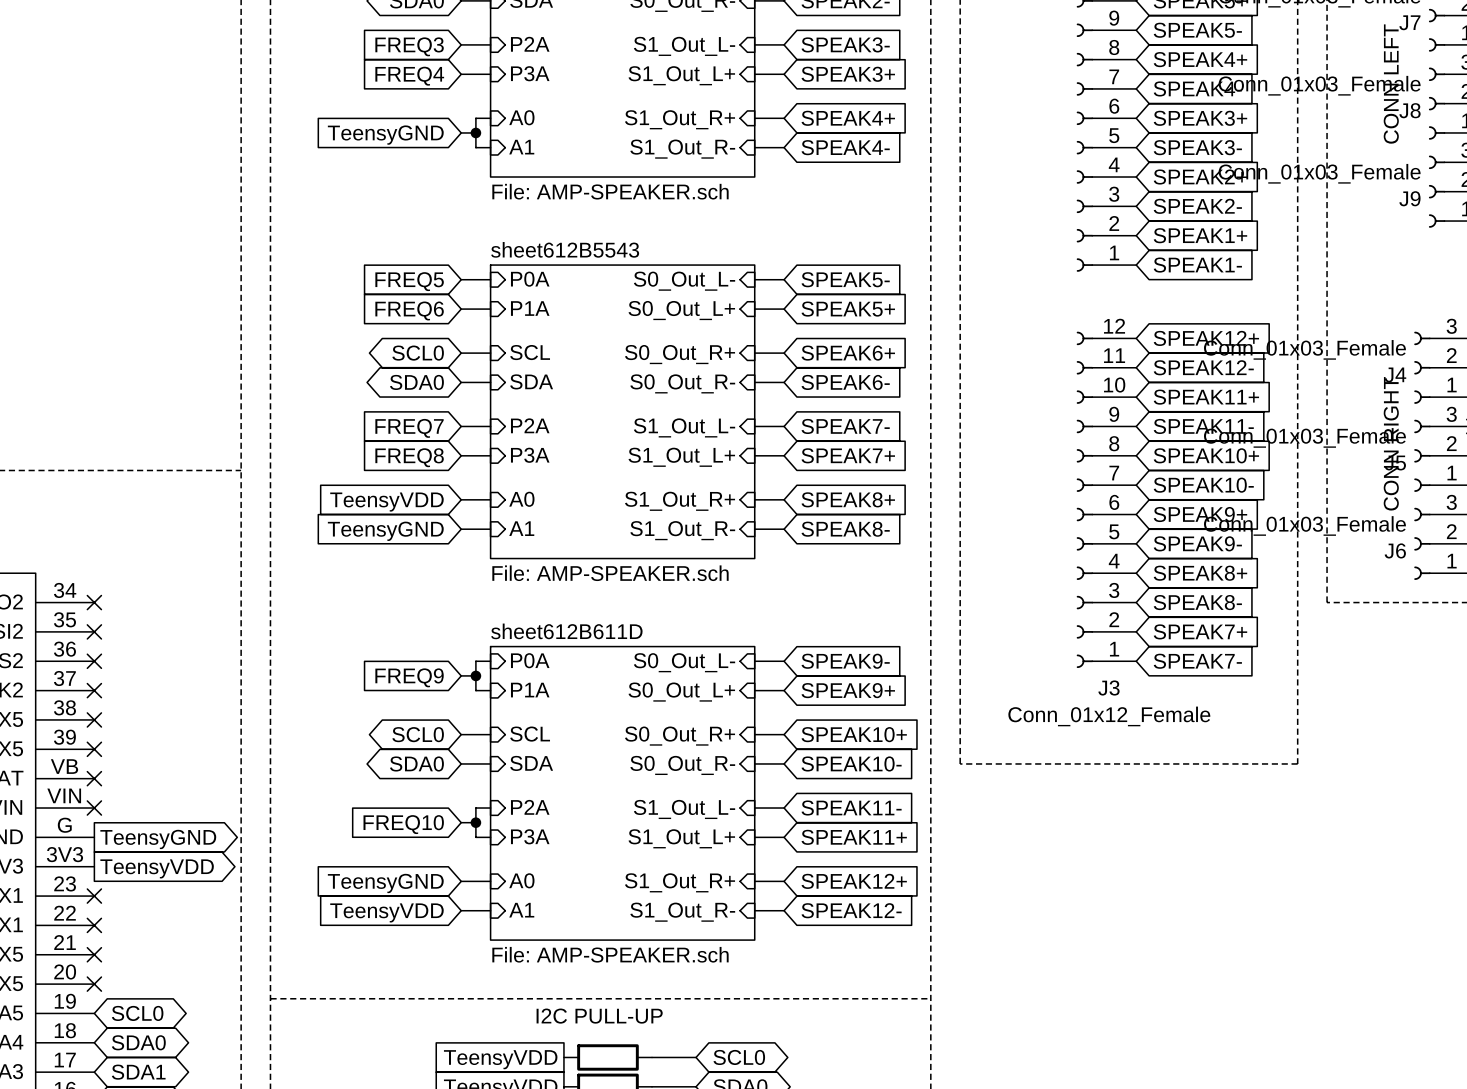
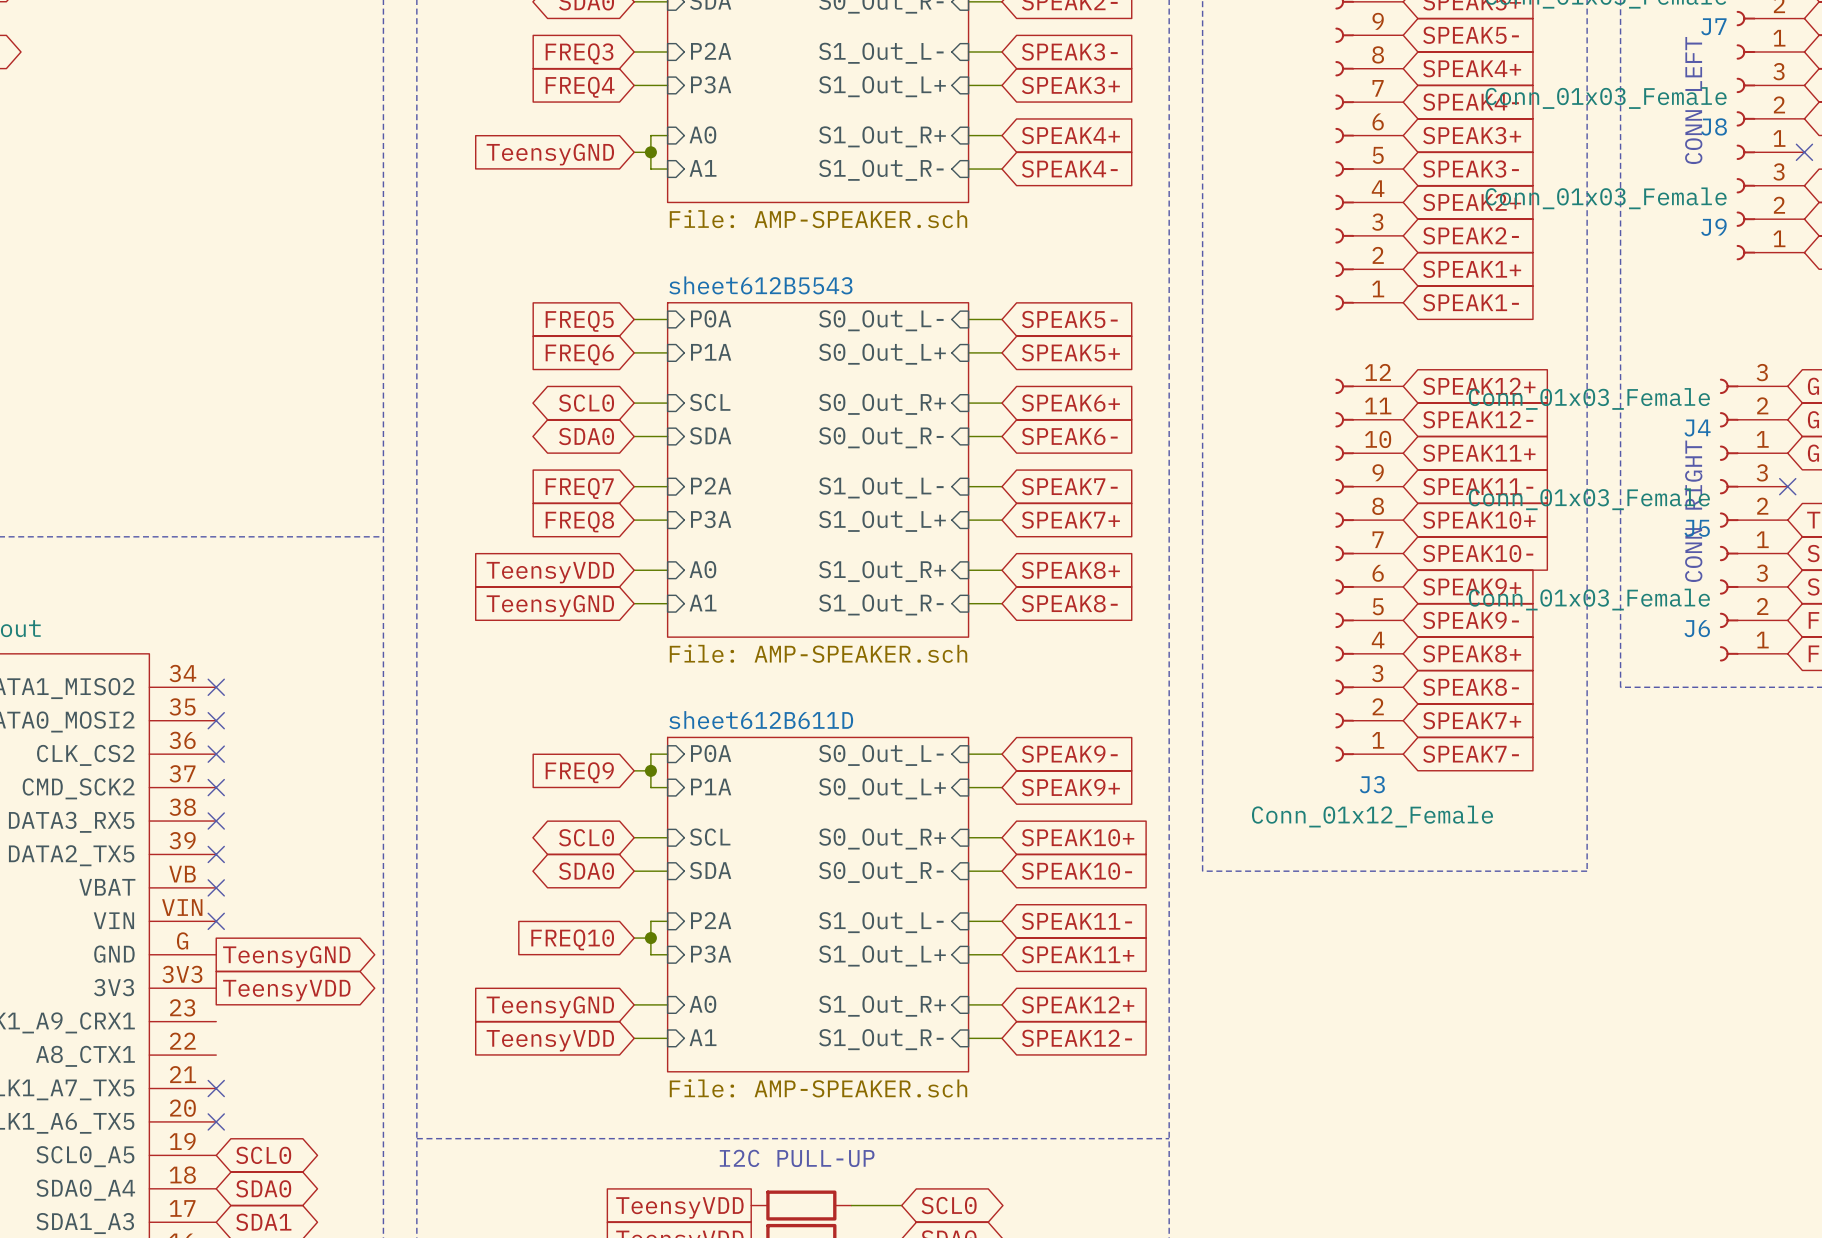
no-connect mark: (94, 896) -> none
no-connect mark: (94, 925) -> none

